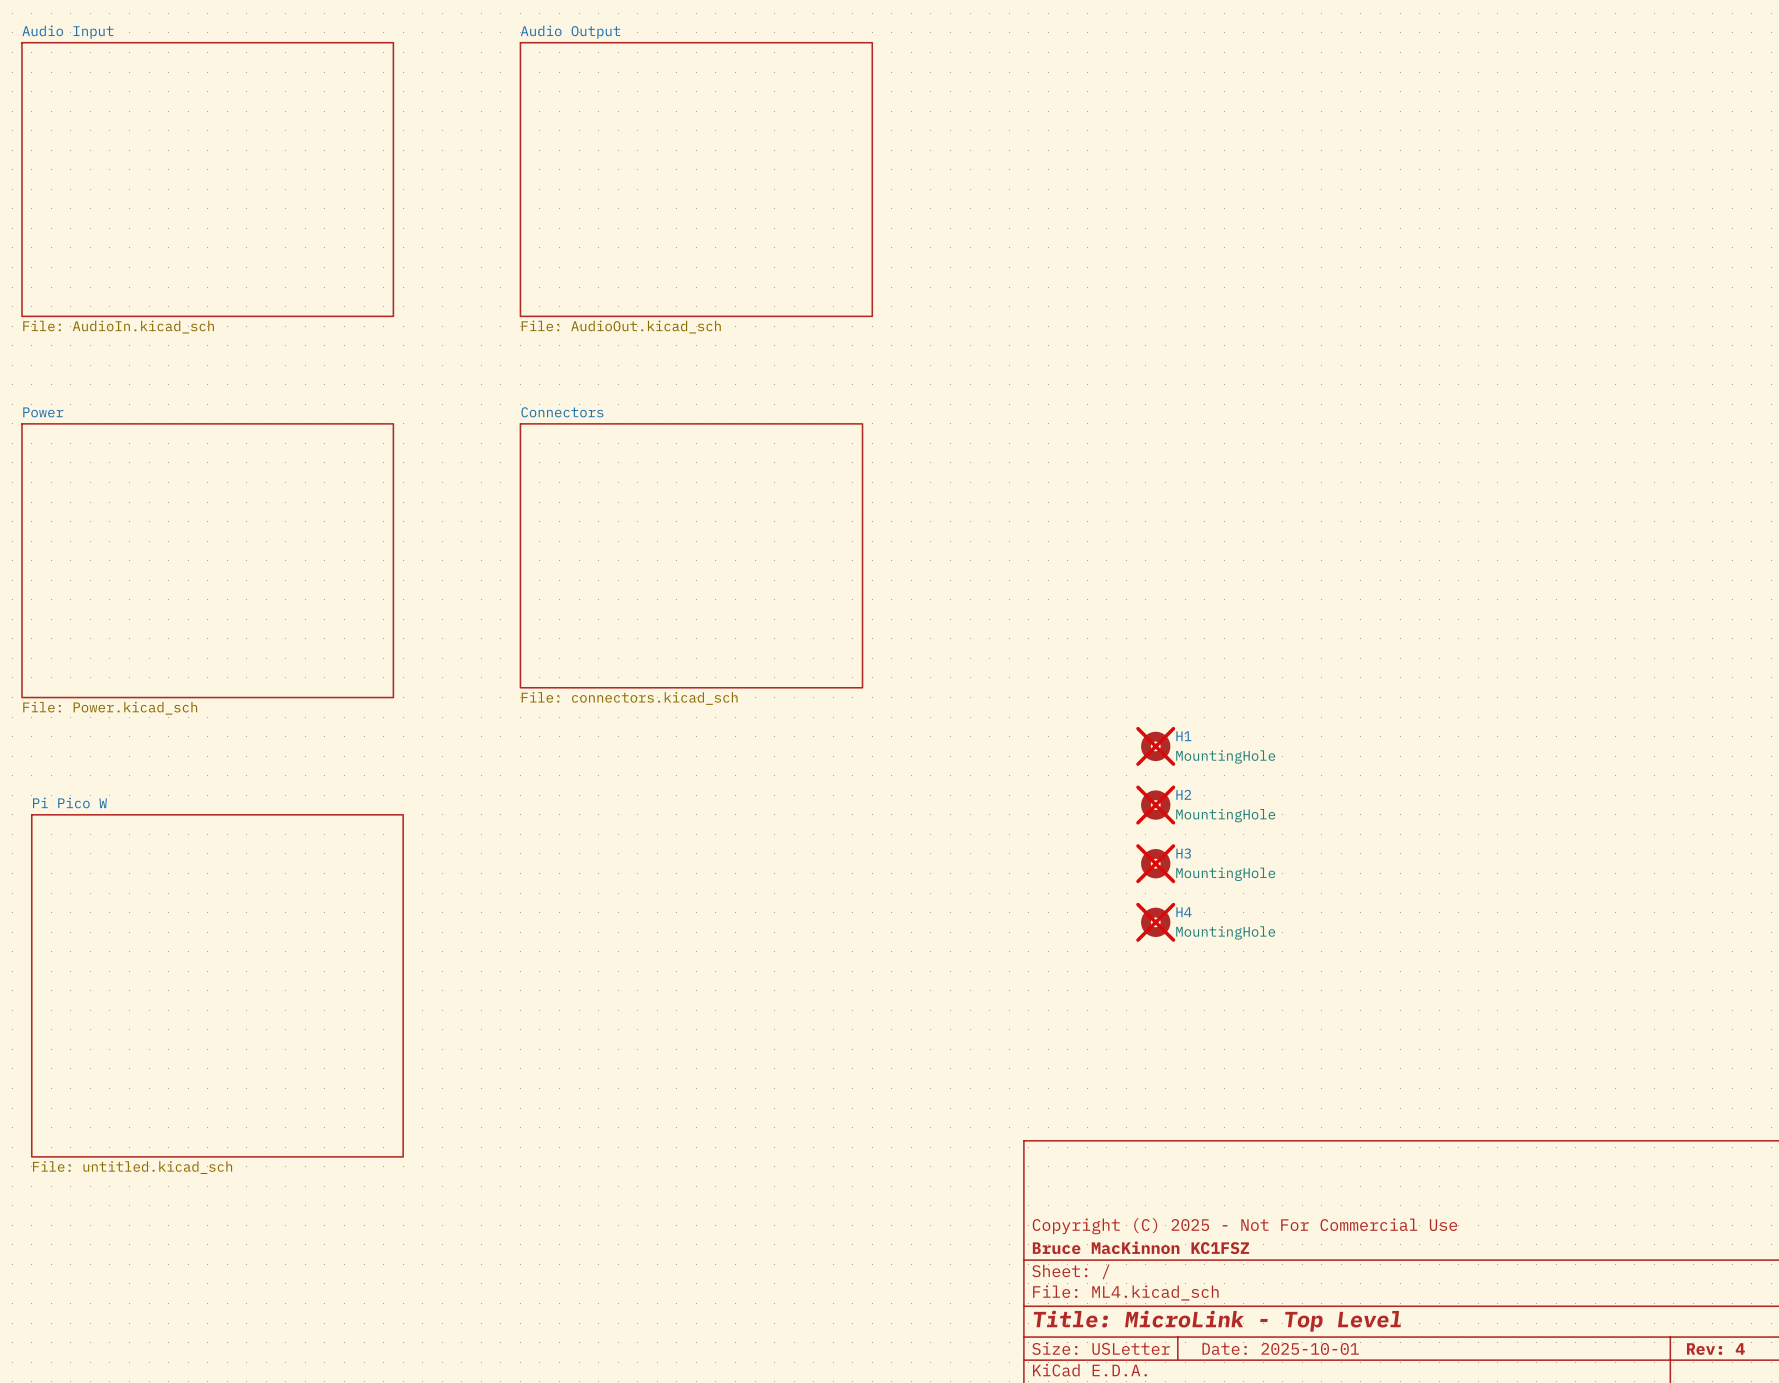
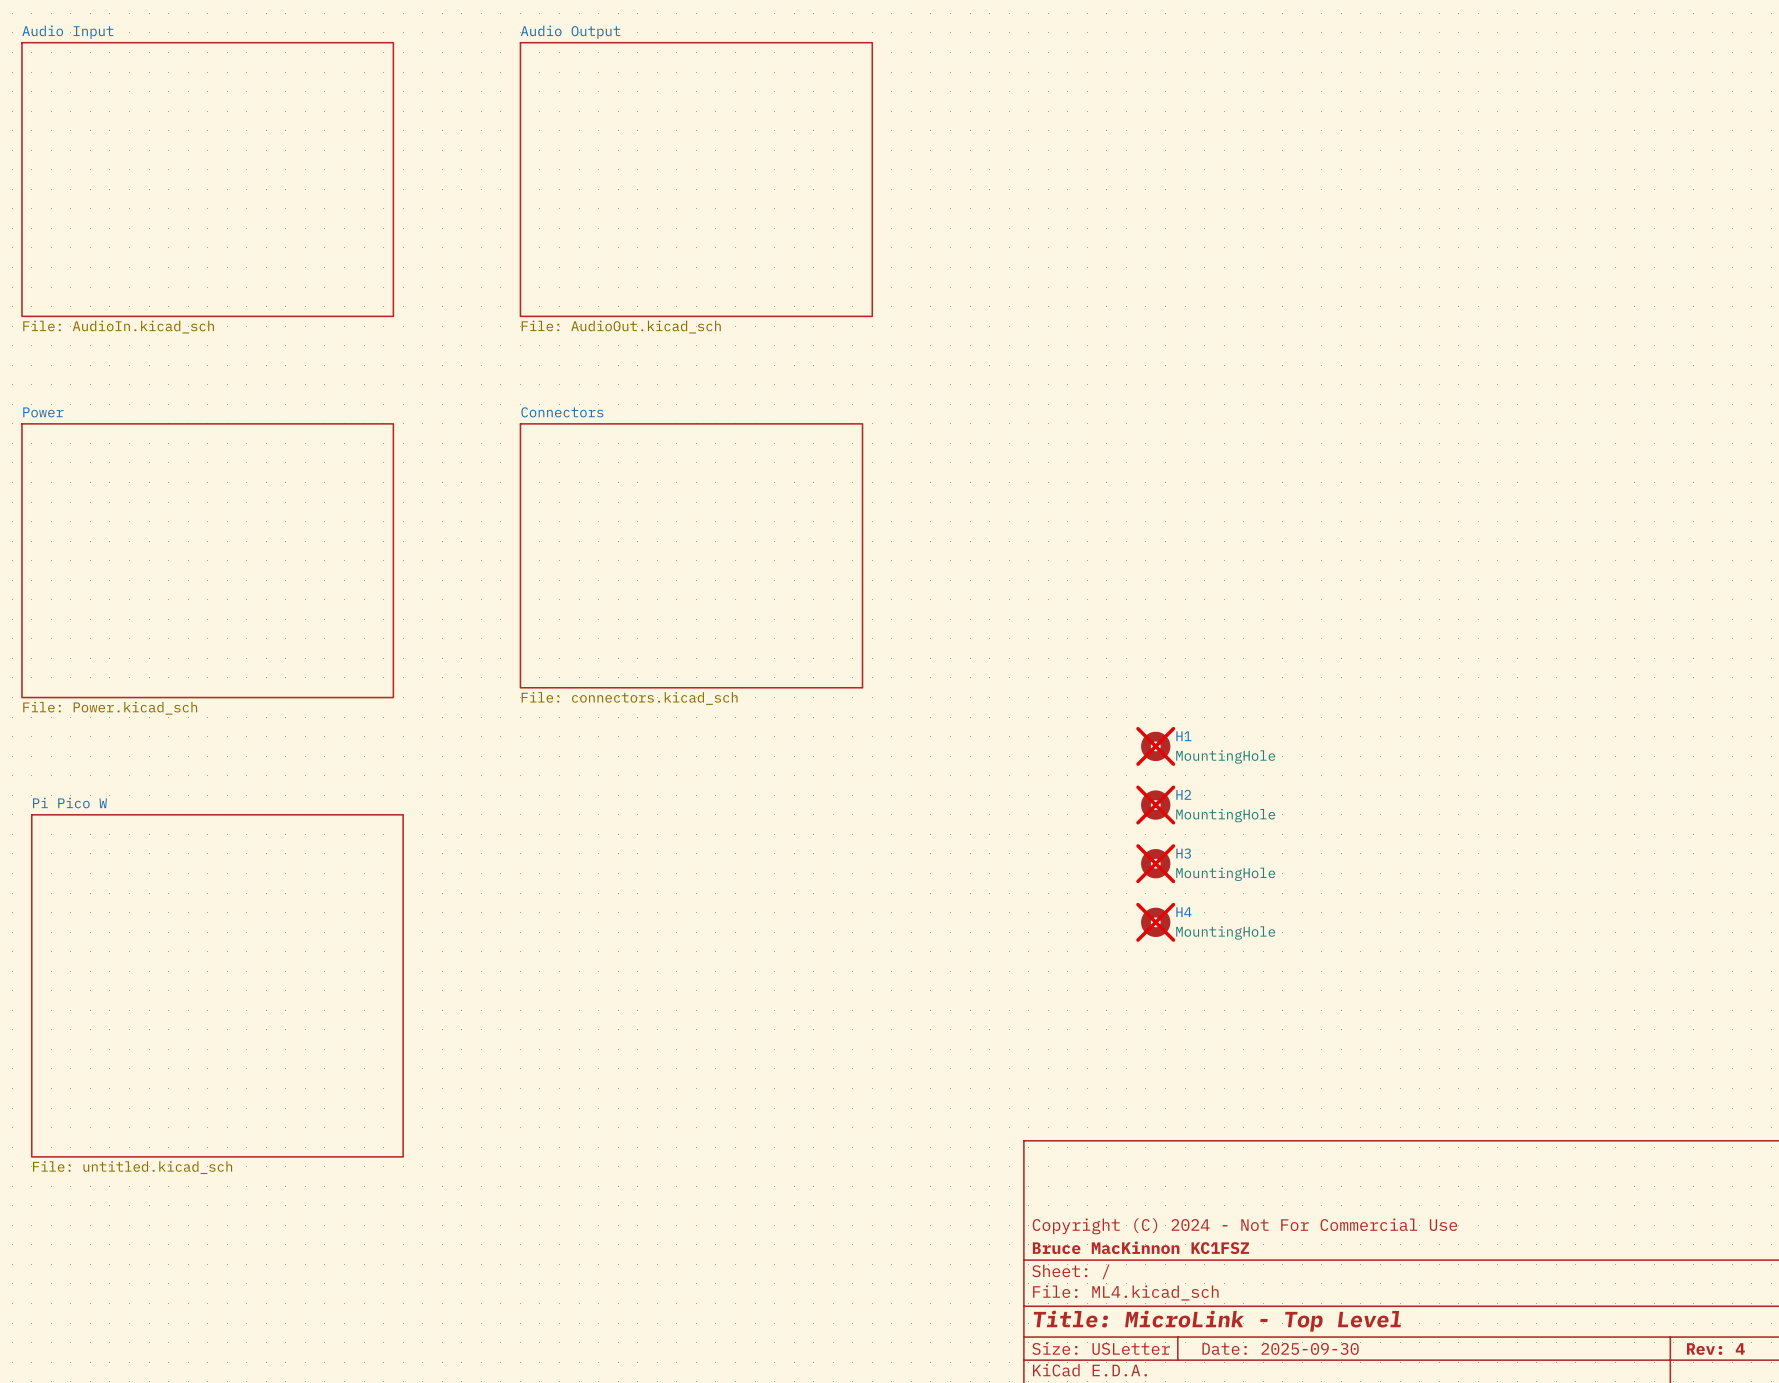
title block: Copyright (C) 2025 - Not For Commercial Use (1244, 1226) -> Copyright (C) 2024 - Not For Commercial Use (1244, 1226)
title block: Date: 2025-10-01 (1280, 1348) -> Date: 2025-09-30 (1280, 1348)

